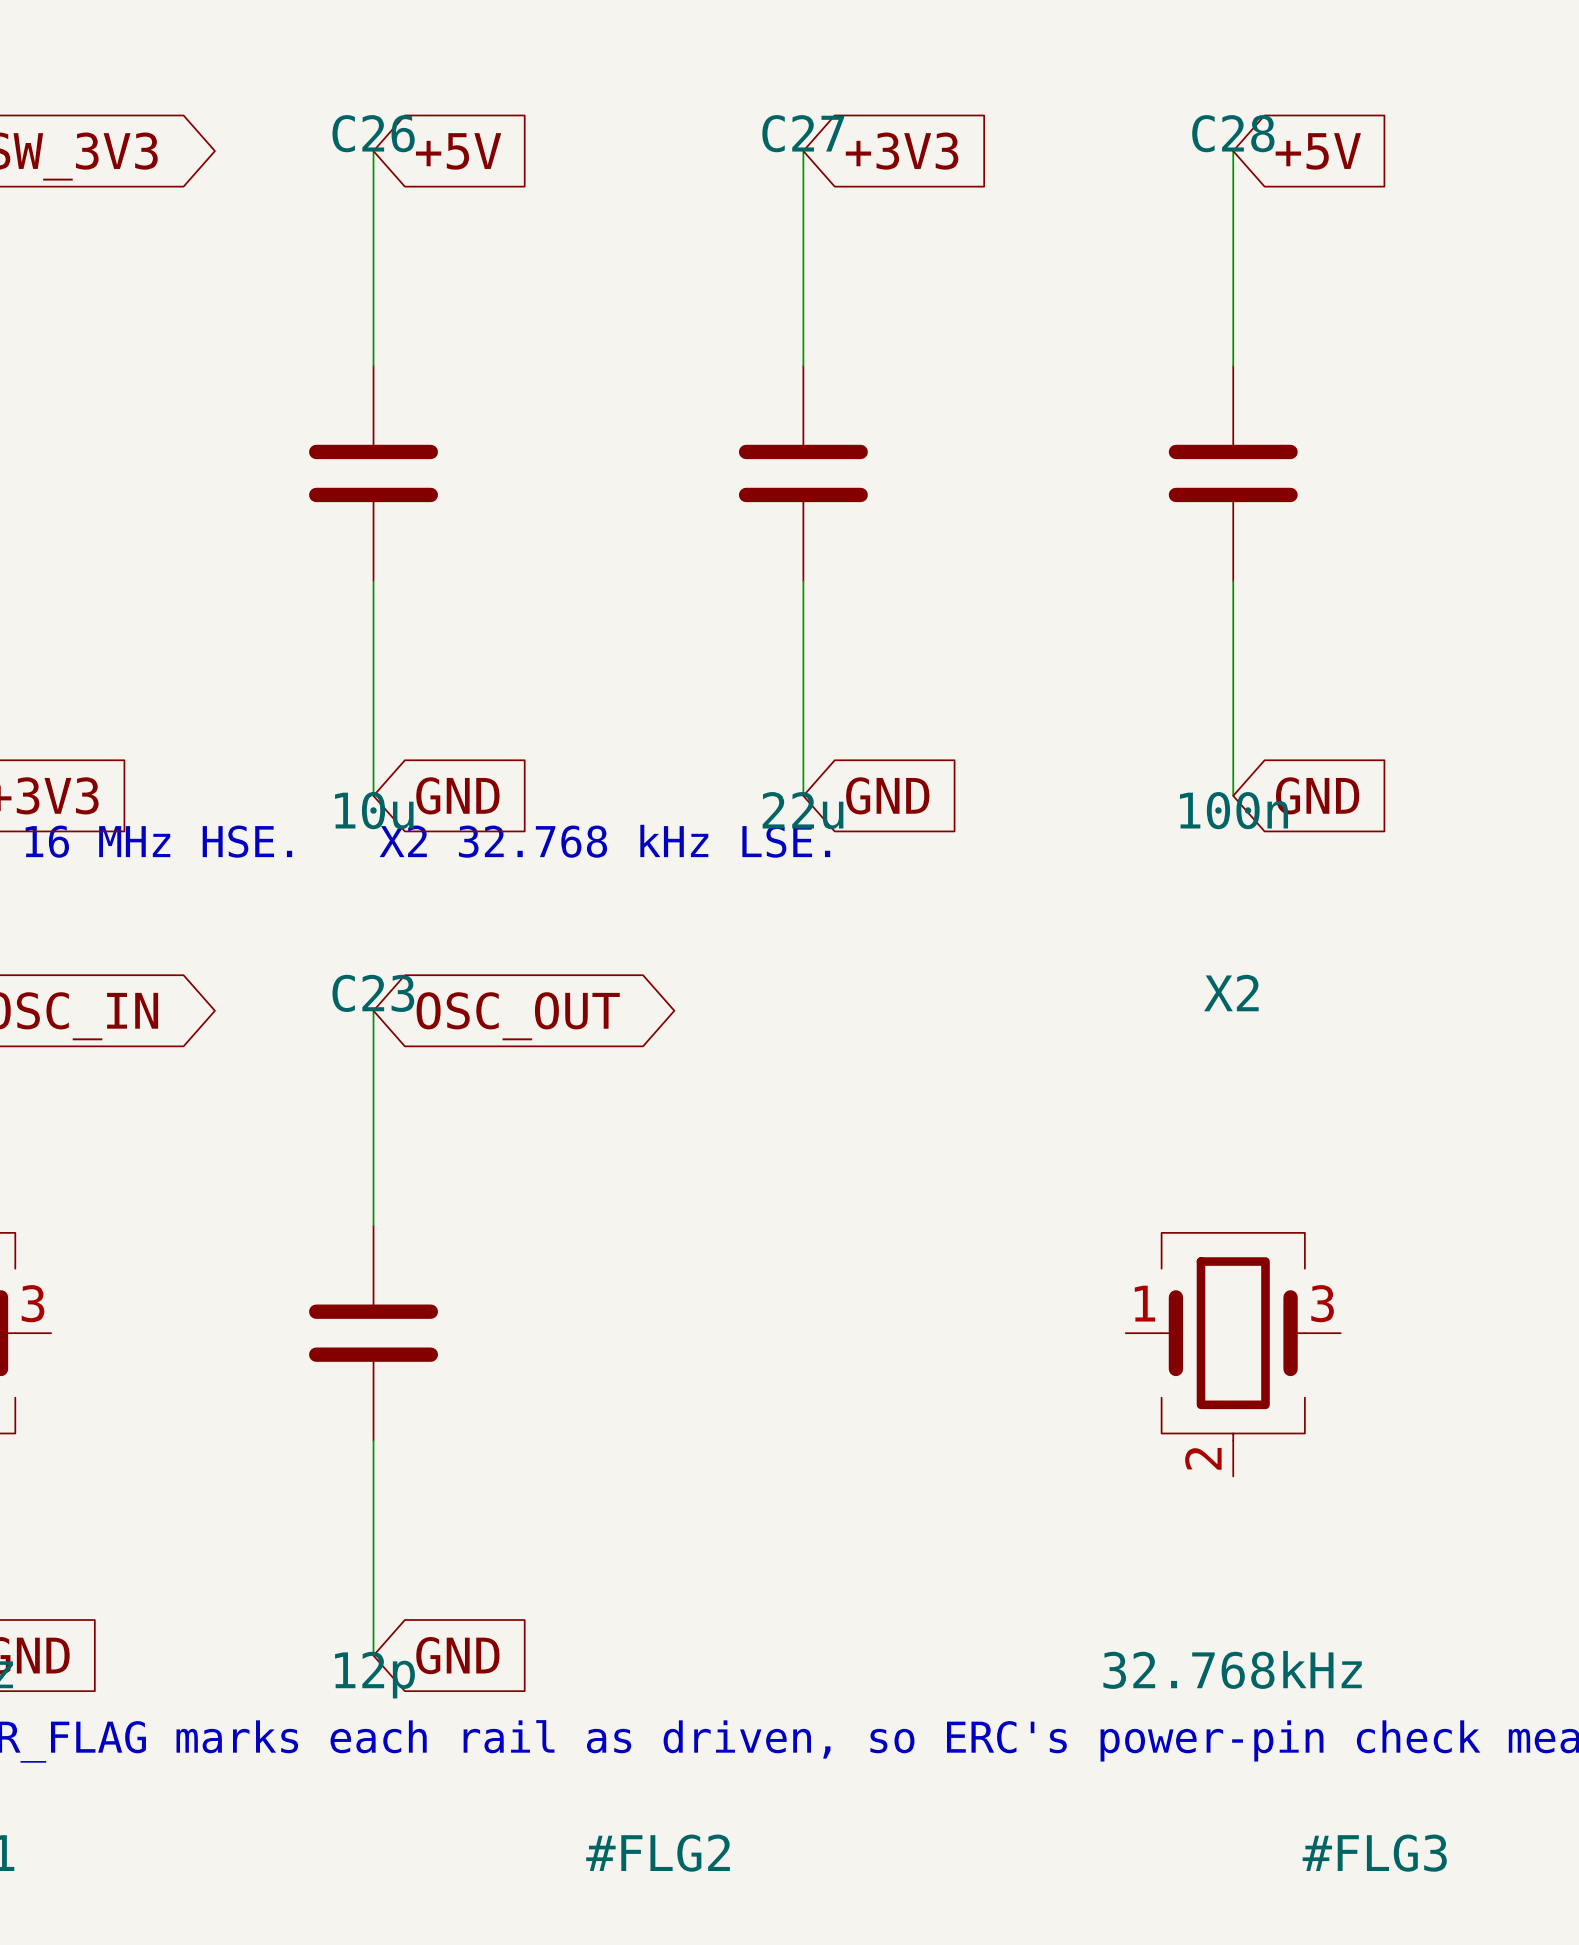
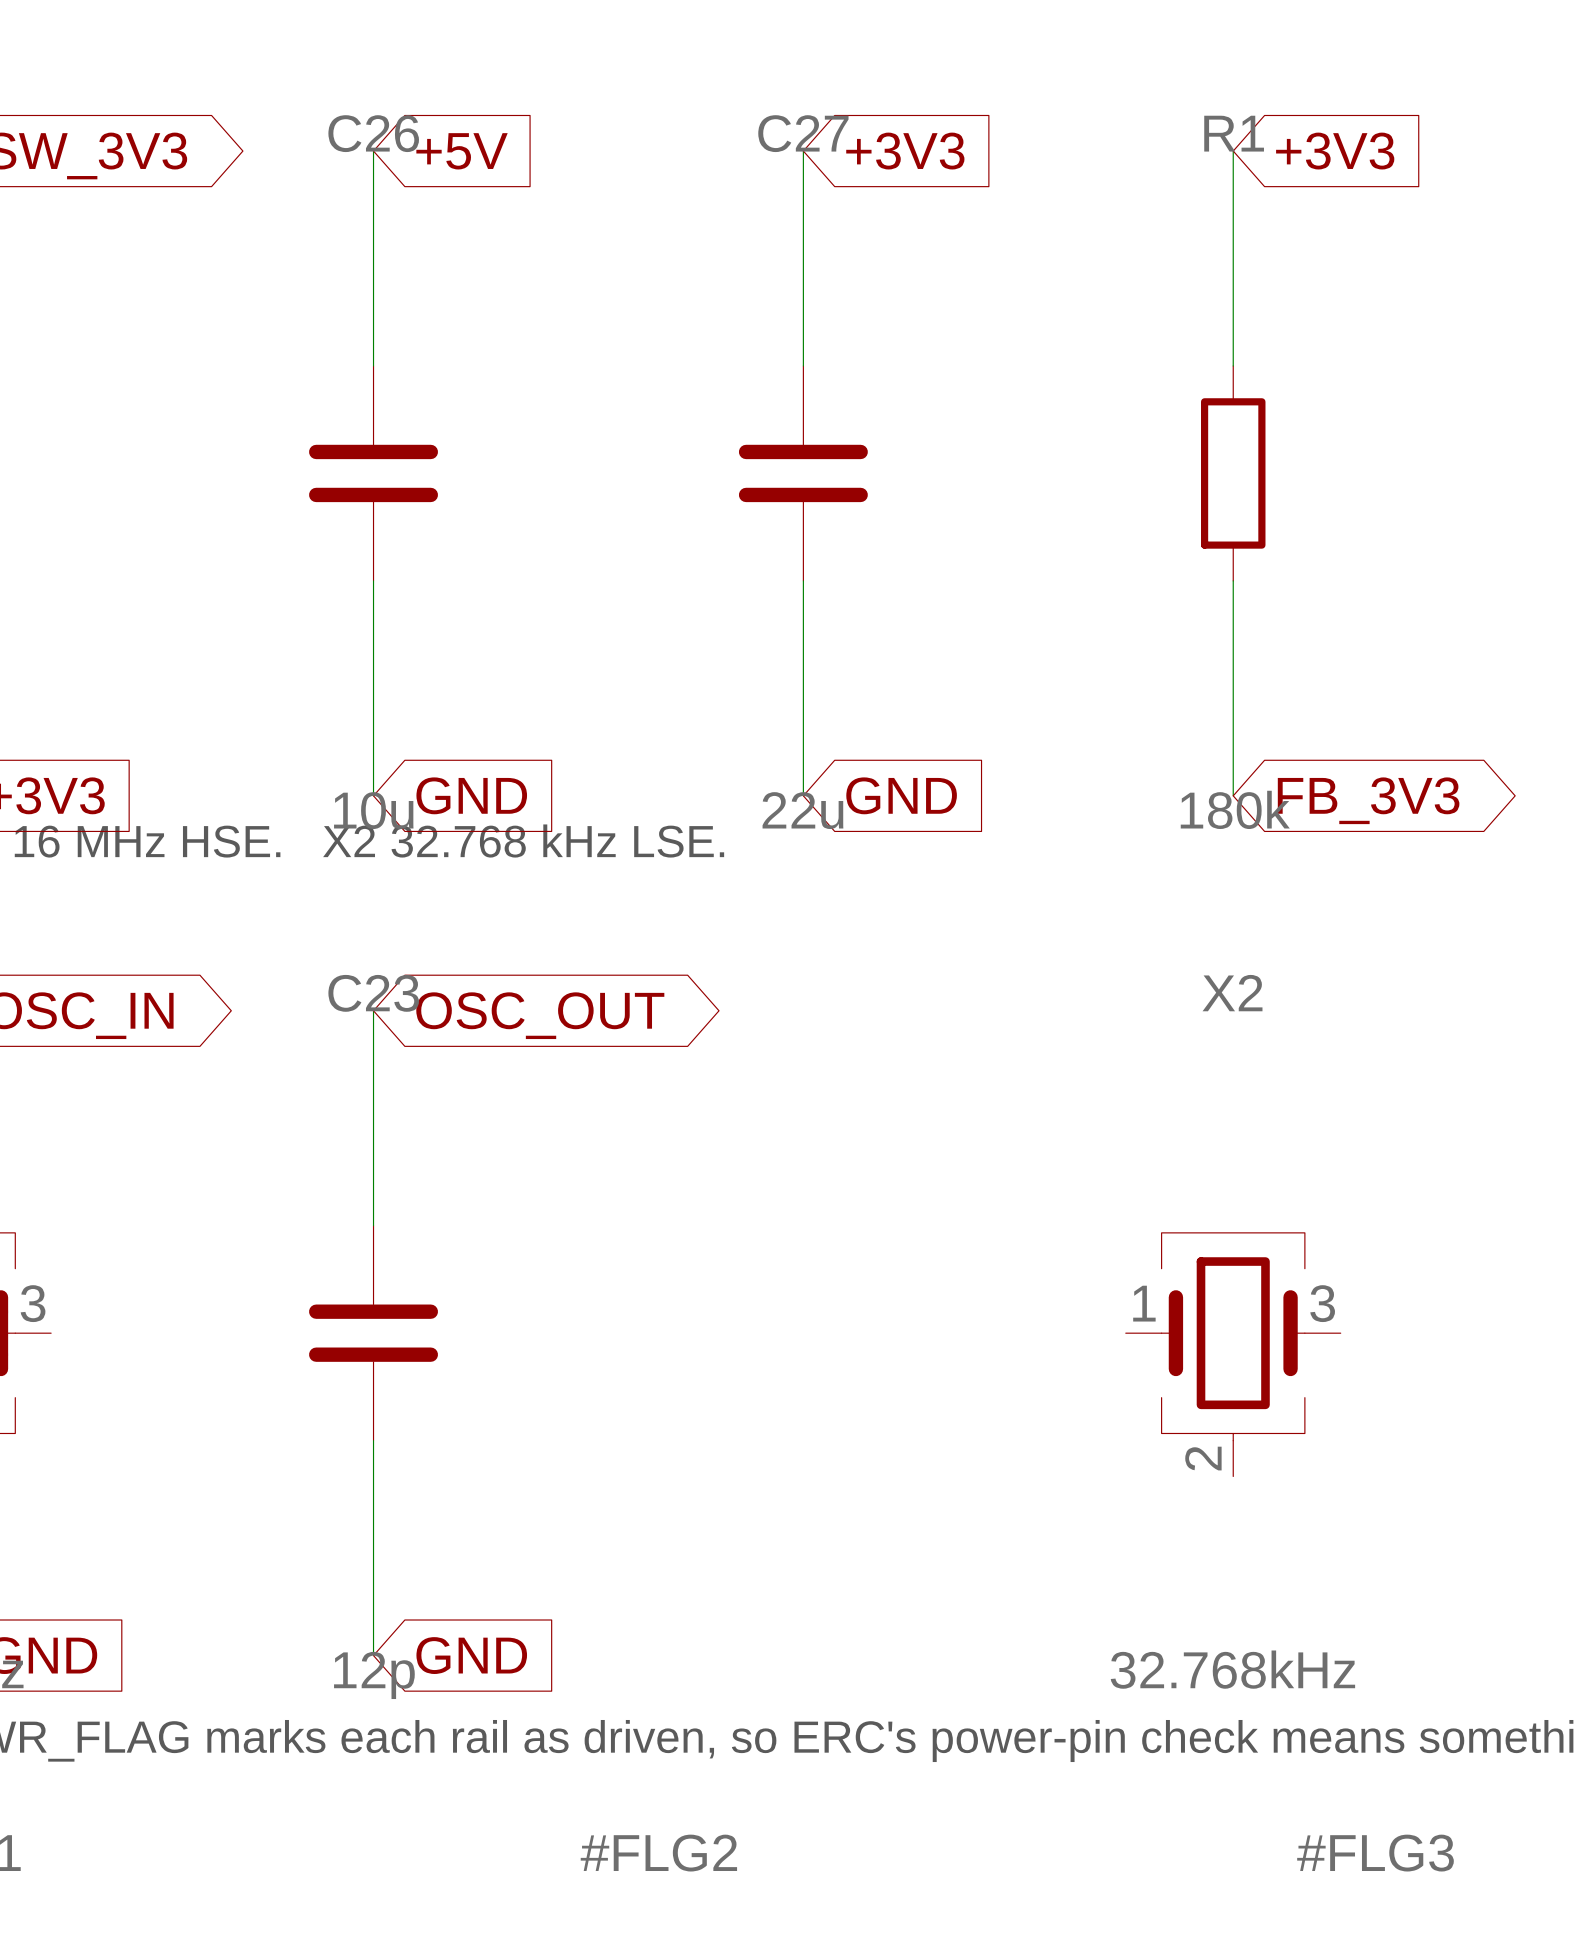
global label: +5V (1318, 151) -> +3V3 (1335, 151)
C28: 100n (1233, 473) -> none
R1: none -> 180k (1233, 473)
global label shape: input (1317, 795) -> bidirectional (1368, 800)
global label: GND (1317, 795) -> FB_3V3 (1368, 800)

